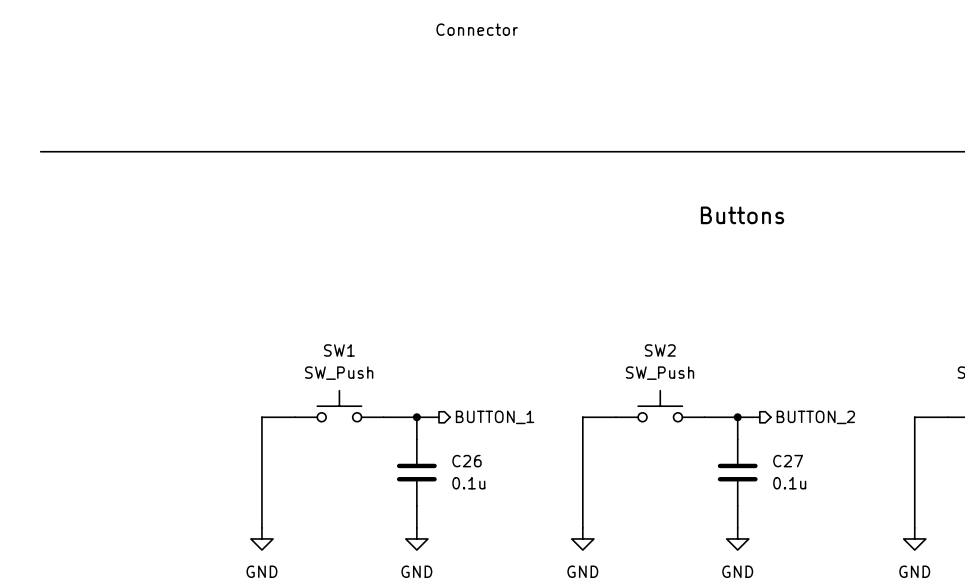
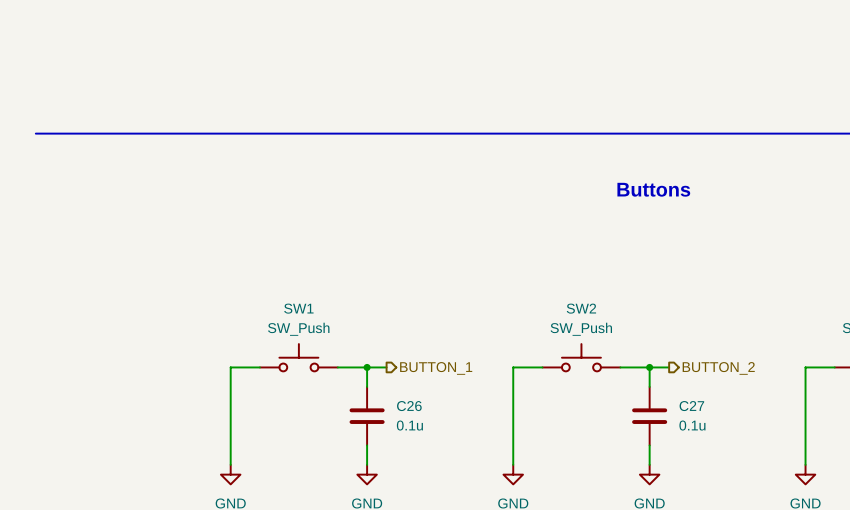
text: Connector (477, 29) -> none

